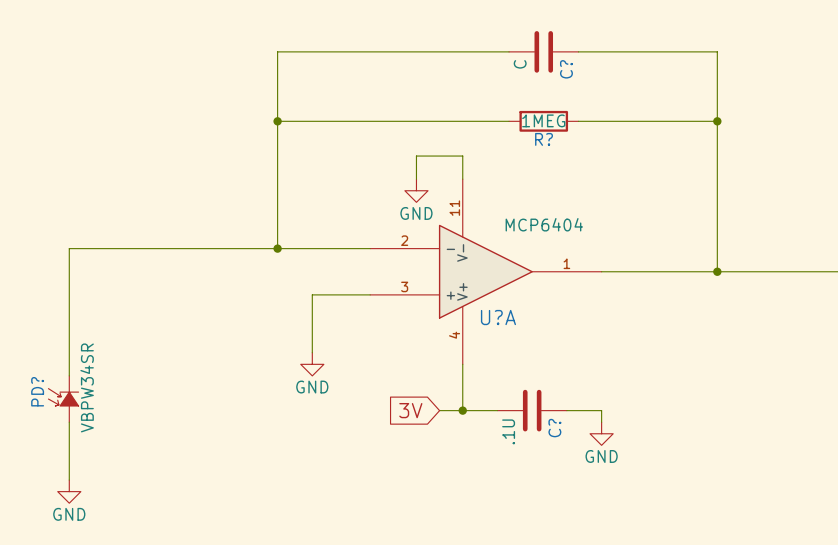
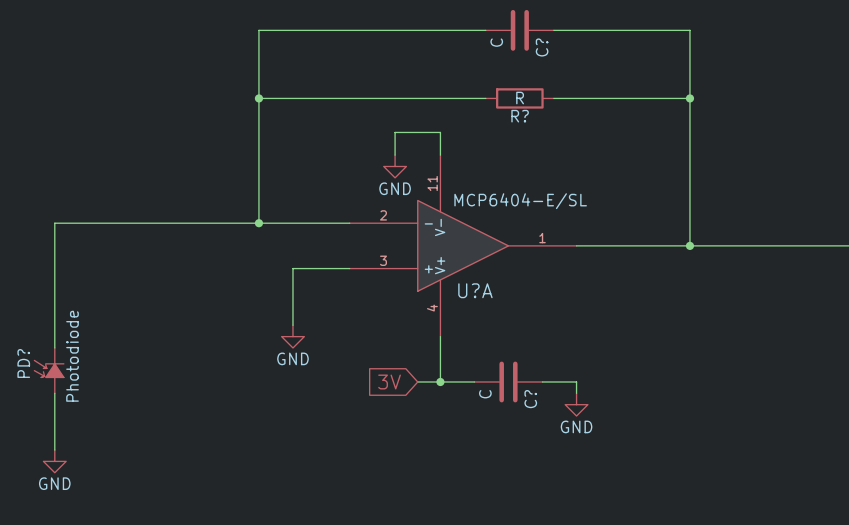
R? value: 1MEG (543, 120) -> R (520, 98)
U?A value: MCP6404 (544, 224) -> MCP6404-E/SL (520, 201)
PD? value: VBPW34SR (87, 387) -> Photodiode (72, 356)
C? value: .1U (508, 431) -> C (485, 394)

